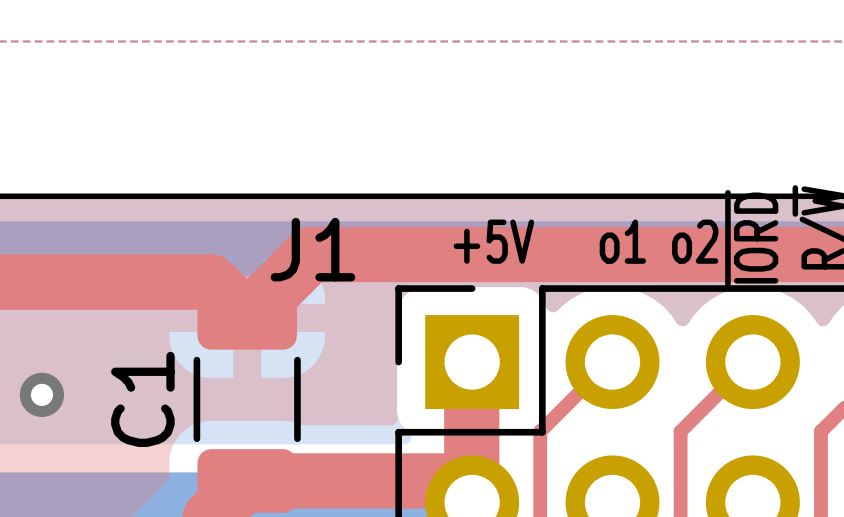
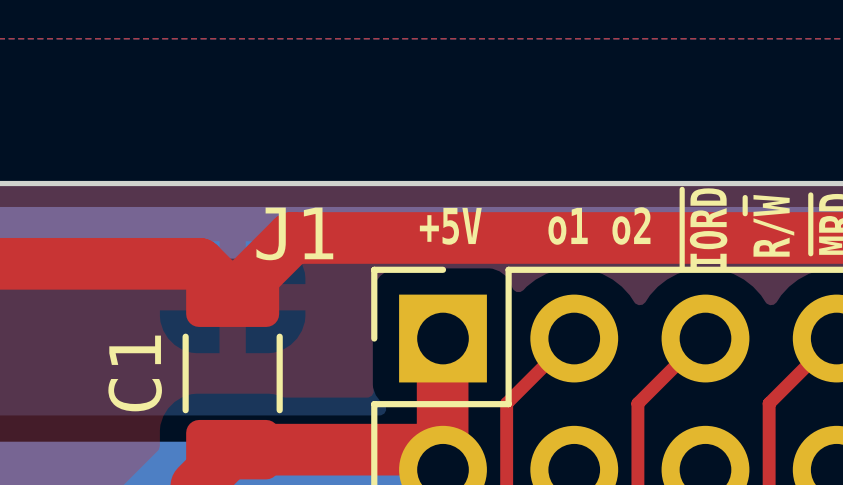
via: (41, 394) -> none

